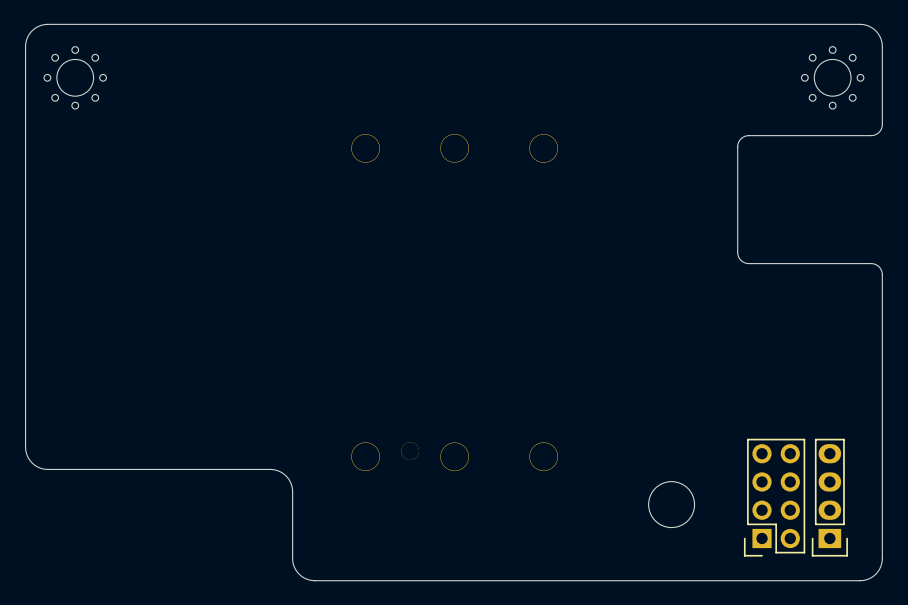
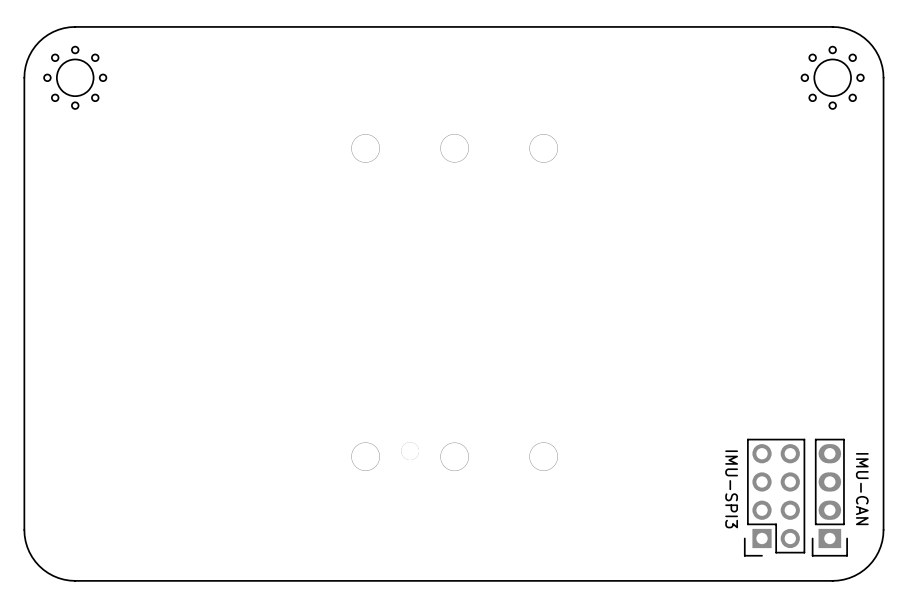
board edge: (860, 24) (47, 24) (36, 27) (28, 35) (25, 46) (25, 447) (28, 458) (36, 466) (47, 469) (270, 469) (278, 471) (288, 478) (292, 488) (293, 564) (299, 574) (311, 580) (860, 580) (871, 577) (879, 569) (882, 558) (881, 270) (877, 265) (871, 263) (747, 263) (739, 259) (737, 252) (737, 146) (742, 137) (748, 135) (871, 135) (880, 130) (882, 43) (875, 30) (868, 26) (860, 24) -> (832, 26) (854, 31) (868, 41) (878, 55) (883, 77) (883, 530) (880, 546) (875, 557) (859, 573) (843, 579) (832, 580) (75, 580) (53, 575) (43, 569) (32, 557) (25, 541) (24, 530) (24, 77) (29, 55) (35, 46) (48, 34) (63, 28) (75, 26) (832, 26)
round board edge: [648, 481, 696, 529] -> none
part value: none -> IMU-SPI3 (731, 489)
part value: none -> IMU-CAN (862, 489)

